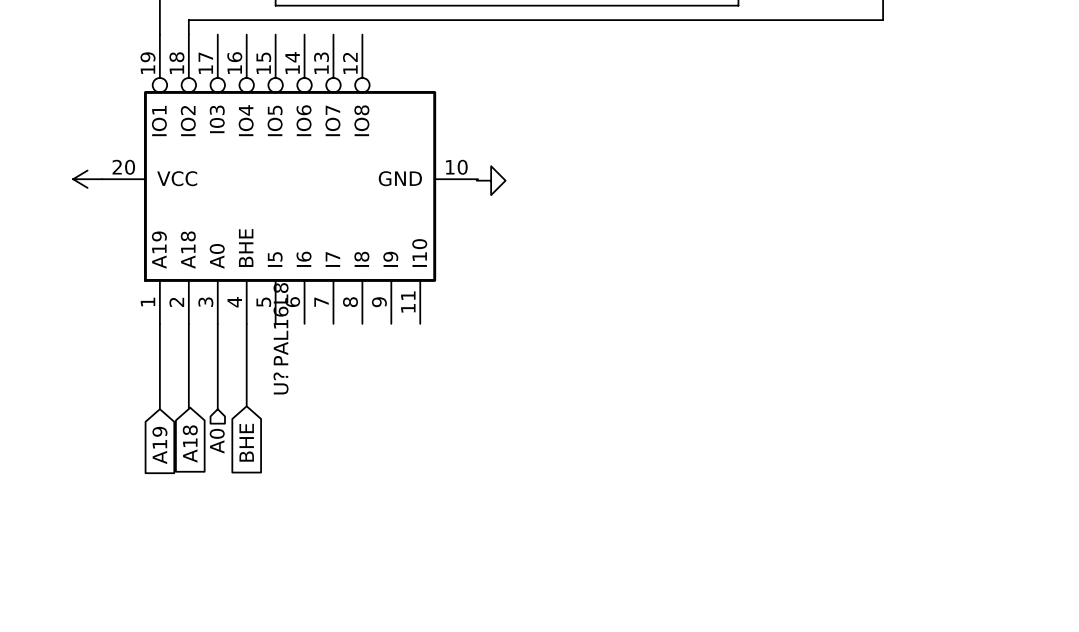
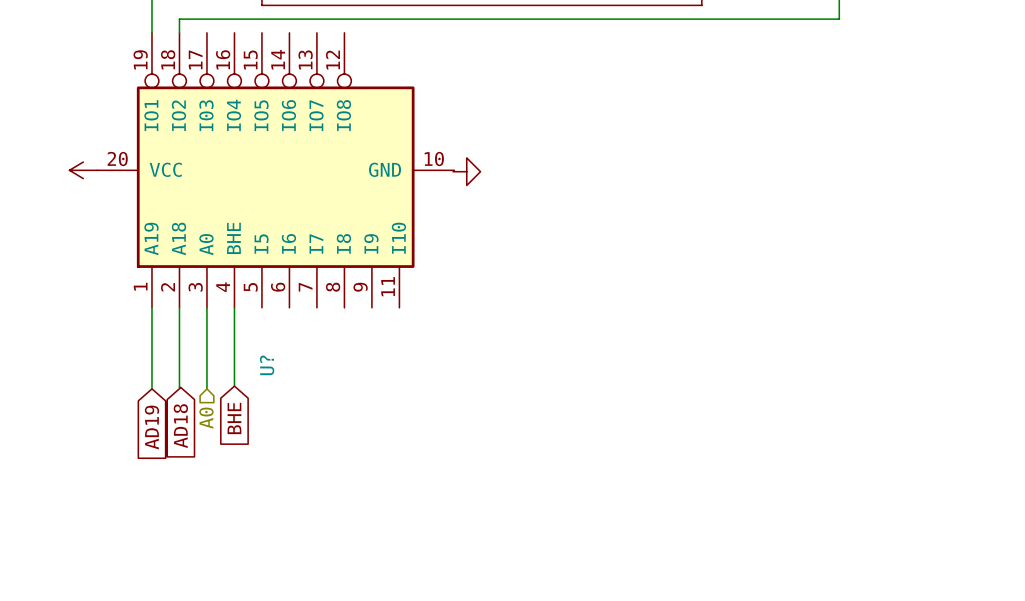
U? value: PAL16L8 (281, 324) -> none
global label: A18 (190, 444) -> AD18 (180, 426)
global label: A19 (159, 445) -> AD19 (151, 427)

